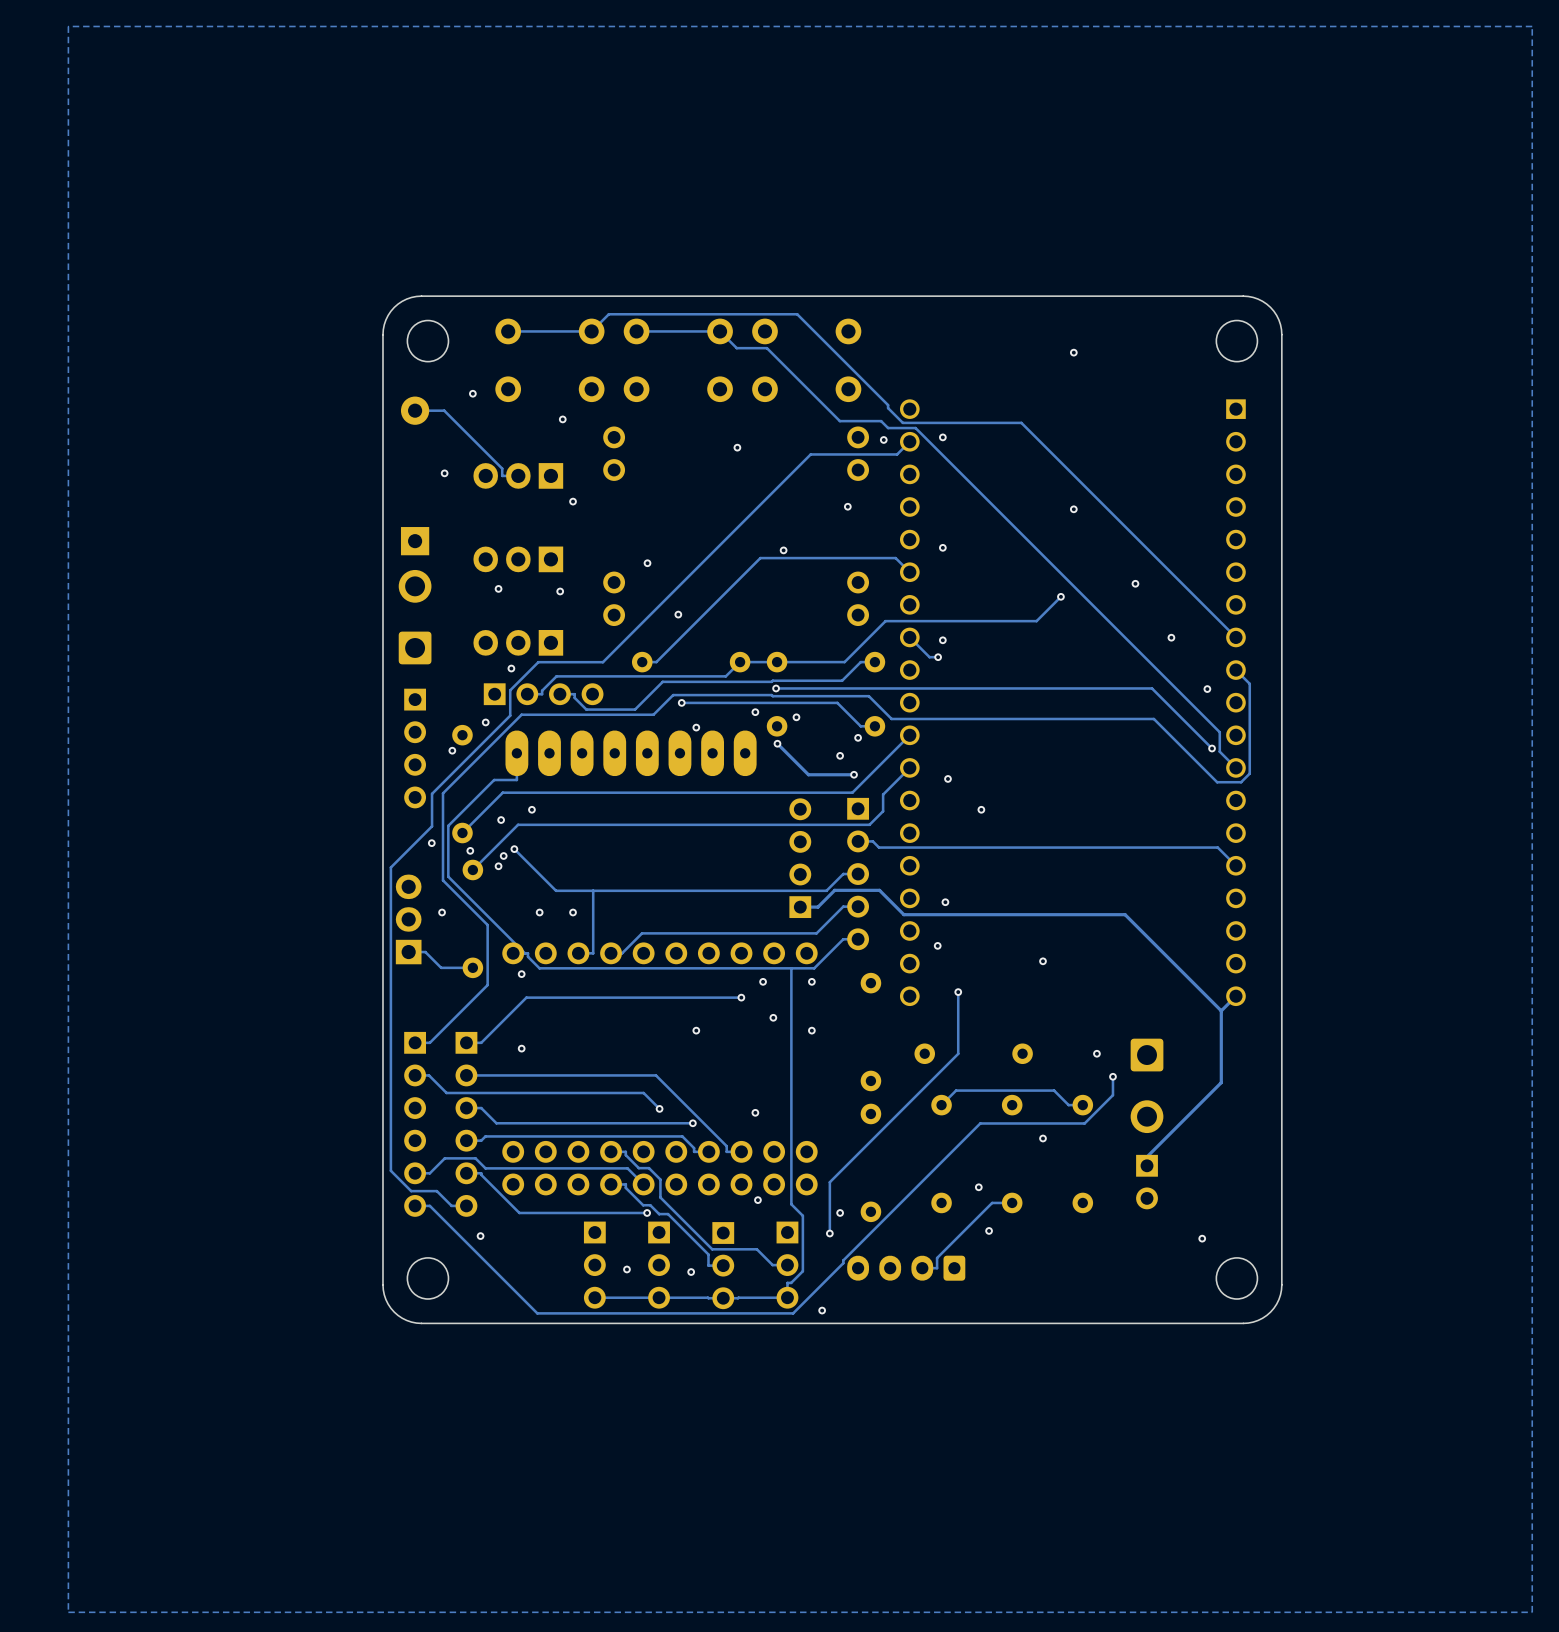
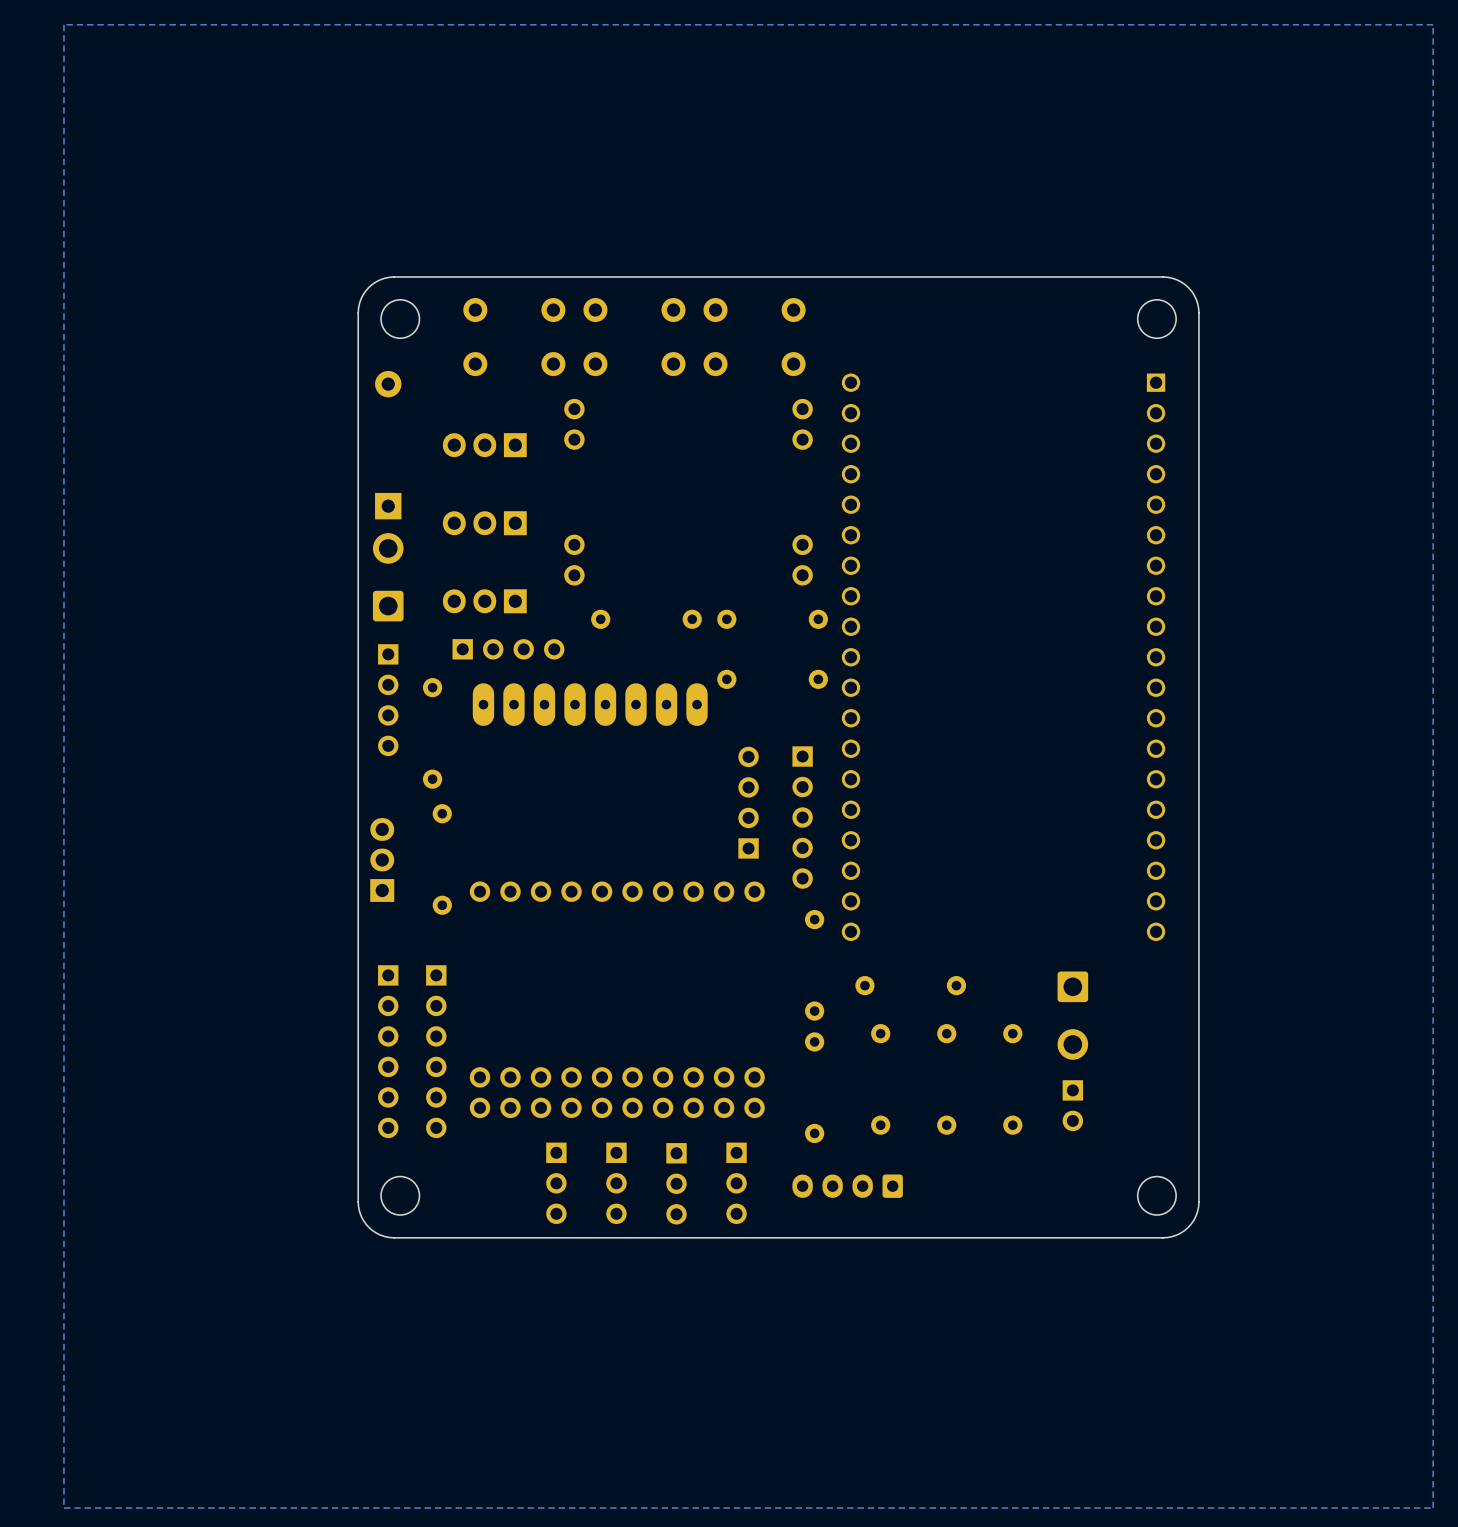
track: (508, 331) (591, 331) (608, 314) (797, 314) (888, 405) (888, 408) (902, 422) (1021, 422) (1235, 637) -> none
track: (636, 331) (720, 331) (736, 348) (766, 348) (839, 421) (881, 421) (888, 428) (915, 428) (1219, 732) (1219, 751) (1235, 767) -> none
via: (1073, 352) -> none
via: (472, 393) -> none
track: (415, 410) (444, 410) (502, 468) (502, 475) (518, 475) -> none
via: (562, 419) -> none
via: (942, 437) -> none
via: (883, 439) -> none
track: (909, 441) (897, 454) (810, 454) (602, 662) (538, 662) (510, 690) (510, 715) (432, 793) (432, 826) (390, 867) (390, 1170) (411, 1191) (436, 1191) (451, 1205) (466, 1205) -> none
via: (737, 447) -> none
via: (444, 473) -> none
via: (573, 501) -> none
via: (847, 506) -> none
via: (1073, 509) -> none
via: (942, 547) -> none
via: (783, 550) -> none
via: (647, 563) -> none
track: (909, 572) (895, 558) (760, 558) (656, 662) (642, 662) -> none
via: (1135, 583) -> none
via: (498, 588) -> none
via: (560, 591) -> none
track: (1060, 596) (1036, 621) (885, 621) (844, 662) (740, 662) (725, 676) (556, 676) (542, 690) (542, 694) (527, 694) -> none
via: (1060, 596) -> none
via: (678, 614) -> none
track: (909, 637) (929, 657) (938, 657) -> none
via: (1171, 637) -> none
via: (942, 640) -> none
via: (938, 657) -> none
track: (874, 662) (860, 662) (842, 680) (662, 681) (635, 709) (586, 709) (574, 697) (574, 694) (559, 694) -> none
via: (511, 668) -> none
track: (1235, 670) (1249, 683) (1249, 773) (1241, 782) (1217, 782) (1153, 718) (891, 718) (868, 696) (771, 695) (673, 695) (653, 714) (521, 714) (443, 793) (443, 880) (487, 925) (487, 985) (429, 1042) (415, 1042) -> none
track: (776, 688) (1152, 688) (1212, 748) -> none
via: (776, 688) -> none
via: (1207, 689) -> none
track: (681, 702) (837, 702) (860, 726) (874, 726) -> none
via: (681, 702) -> none
via: (755, 712) -> none
via: (796, 717) -> none
via: (485, 722) -> none
via: (696, 727) -> none
track: (909, 735) (852, 792) (502, 792) (462, 833) -> none
via: (858, 737) -> none
track: (777, 743) (808, 774) (854, 774) -> none
via: (777, 743) -> none
via: (1212, 748) -> none
via: (452, 750) -> none
track: (516, 753) (516, 780) (494, 780) (448, 825) (448, 876) (524, 953) -> none
via: (840, 755) -> none
track: (909, 767) (883, 794) (883, 811) (869, 824) (518, 824) (472, 869) -> none
via: (854, 774) -> none
via: (947, 778) -> none
via: (531, 809) -> none
via: (981, 809) -> none
via: (501, 820) -> none
track: (858, 841) (872, 841) (879, 847) (1217, 847) (1235, 865) -> none
via: (431, 843) -> none
track: (514, 849) (556, 890) (826, 890) (843, 874) (858, 874) -> none
via: (514, 849) -> none
via: (470, 850) -> none
via: (503, 856) -> none
via: (498, 866) -> none
track: (593, 890) (593, 953) (578, 953) -> none
via: (945, 902) -> none
track: (858, 906) (843, 906) (816, 933) (642, 933) (622, 953) (611, 953) -> none
track: (800, 907) (817, 907) (834, 890) (879, 890) (903, 914) (1125, 914) (1221, 1010) -> none
via: (442, 912) -> none
via: (539, 912) -> none
via: (573, 912) -> none
track: (858, 939) (843, 939) (814, 968) (539, 968) (527, 956) (527, 953) (513, 953) -> none
via: (937, 945) -> none
track: (408, 952) (425, 952) (441, 967) (472, 967) -> none
via: (1043, 961) -> none
track: (791, 968) (791, 1204) (802, 1215) (802, 1271) (791, 1282) (787, 1282) (787, 1297) (594, 1297) -> none
via: (521, 974) -> none
via: (763, 981) -> none
via: (811, 981) -> none
track: (958, 992) (958, 1053) (829, 1182) (829, 1233) -> none
via: (958, 992) -> none
track: (1235, 996) (1221, 1010) -> none
track: (741, 997) (526, 997) (481, 1042) (466, 1042) -> none
via: (741, 997) -> none
track: (1221, 1010) (1221, 1082) (1147, 1156) (1147, 1165) -> none
via: (773, 1017) -> none
via: (696, 1030) -> none
via: (811, 1030) -> none
via: (521, 1048) -> none
via: (1096, 1053) -> none
track: (415, 1075) (429, 1075) (446, 1092) (643, 1092) (659, 1108) -> none
track: (466, 1075) (655, 1075) (726, 1146) (726, 1151) (741, 1151) -> none
track: (1112, 1076) (1112, 1095) (1084, 1123) (980, 1123) (793, 1313) (537, 1313) (429, 1205) (415, 1205) -> none
via: (1112, 1076) -> none
track: (1082, 1105) (1068, 1105) (1054, 1090) (956, 1090) (941, 1105) -> none
track: (466, 1108) (481, 1108) (496, 1123) (692, 1123) -> none
via: (659, 1108) -> none
via: (755, 1112) -> none
via: (692, 1123) -> none
via: (1043, 1138) -> none
track: (466, 1140) (481, 1140) (485, 1136) (682, 1136) (694, 1148) (694, 1151) (708, 1151) -> none
track: (611, 1151) (625, 1151) (625, 1155) (638, 1168) (649, 1168) (660, 1179) (660, 1197) (712, 1249) (756, 1249) (772, 1265) (787, 1265) -> none
track: (415, 1173) (429, 1173) (444, 1158) (475, 1158) (485, 1168) (627, 1168) (643, 1184) -> none
track: (466, 1173) (481, 1173) (519, 1212) (647, 1212) -> none
track: (611, 1184) (625, 1184) (625, 1187) (643, 1205) (650, 1205) (659, 1214) (668, 1214) (708, 1254) (708, 1265) (723, 1265) -> none
via: (978, 1187) -> none
via: (757, 1200) -> none
track: (1012, 1202) (992, 1202) (937, 1258) (937, 1268) (922, 1268) -> none
via: (647, 1212) -> none
via: (840, 1212) -> none
via: (989, 1230) -> none
via: (829, 1233) -> none
via: (480, 1236) -> none
via: (1202, 1238) -> none
via: (626, 1269) -> none
via: (691, 1272) -> none
via: (822, 1310) -> none

